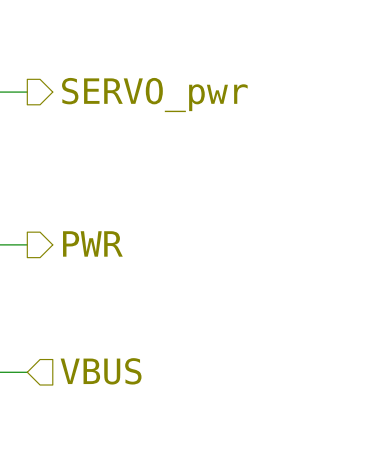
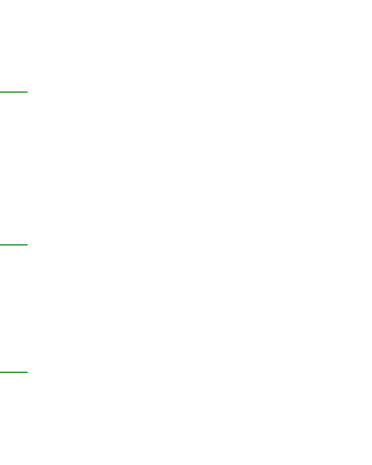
hierarchical label: SERVO_pwr (154, 95) -> none
hierarchical label: PWR (92, 243) -> none
hierarchical label: VBUS (101, 371) -> none

